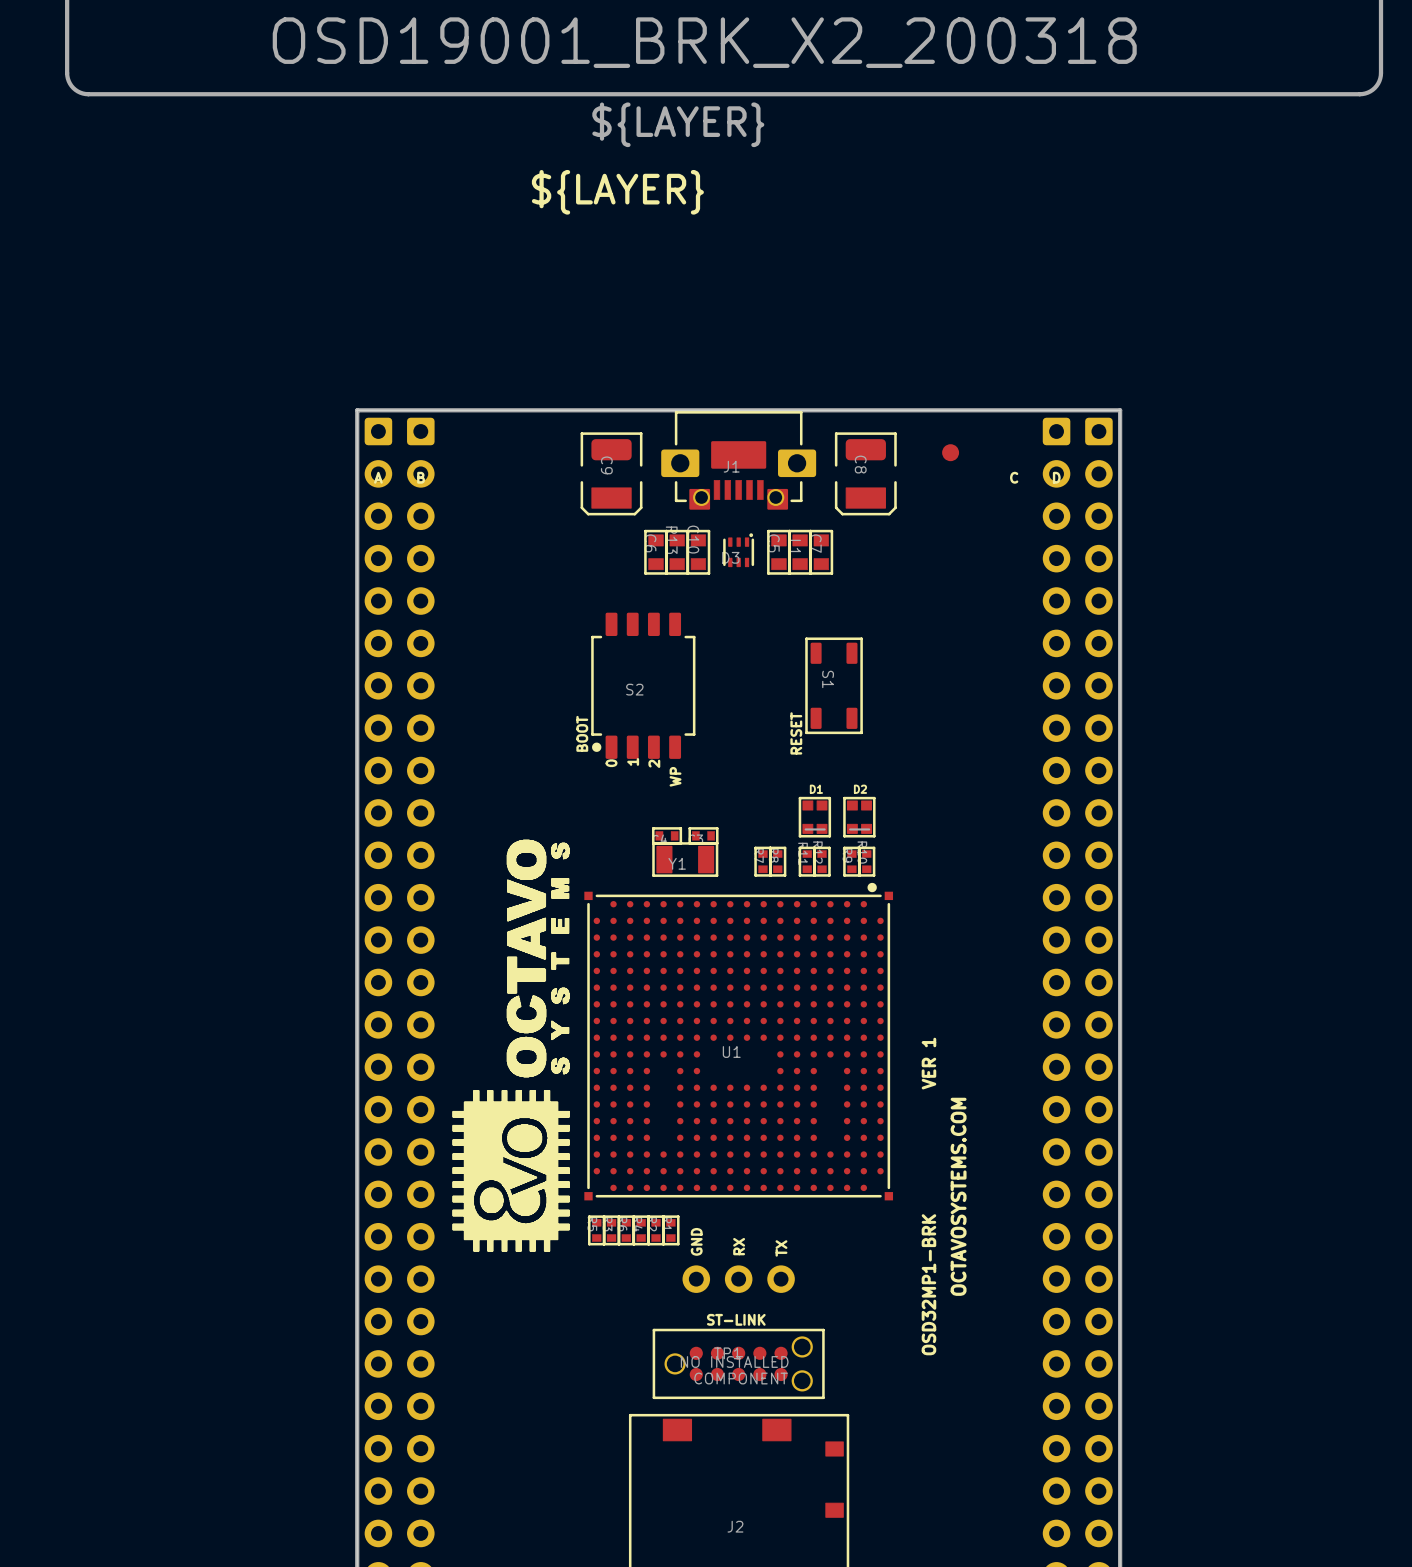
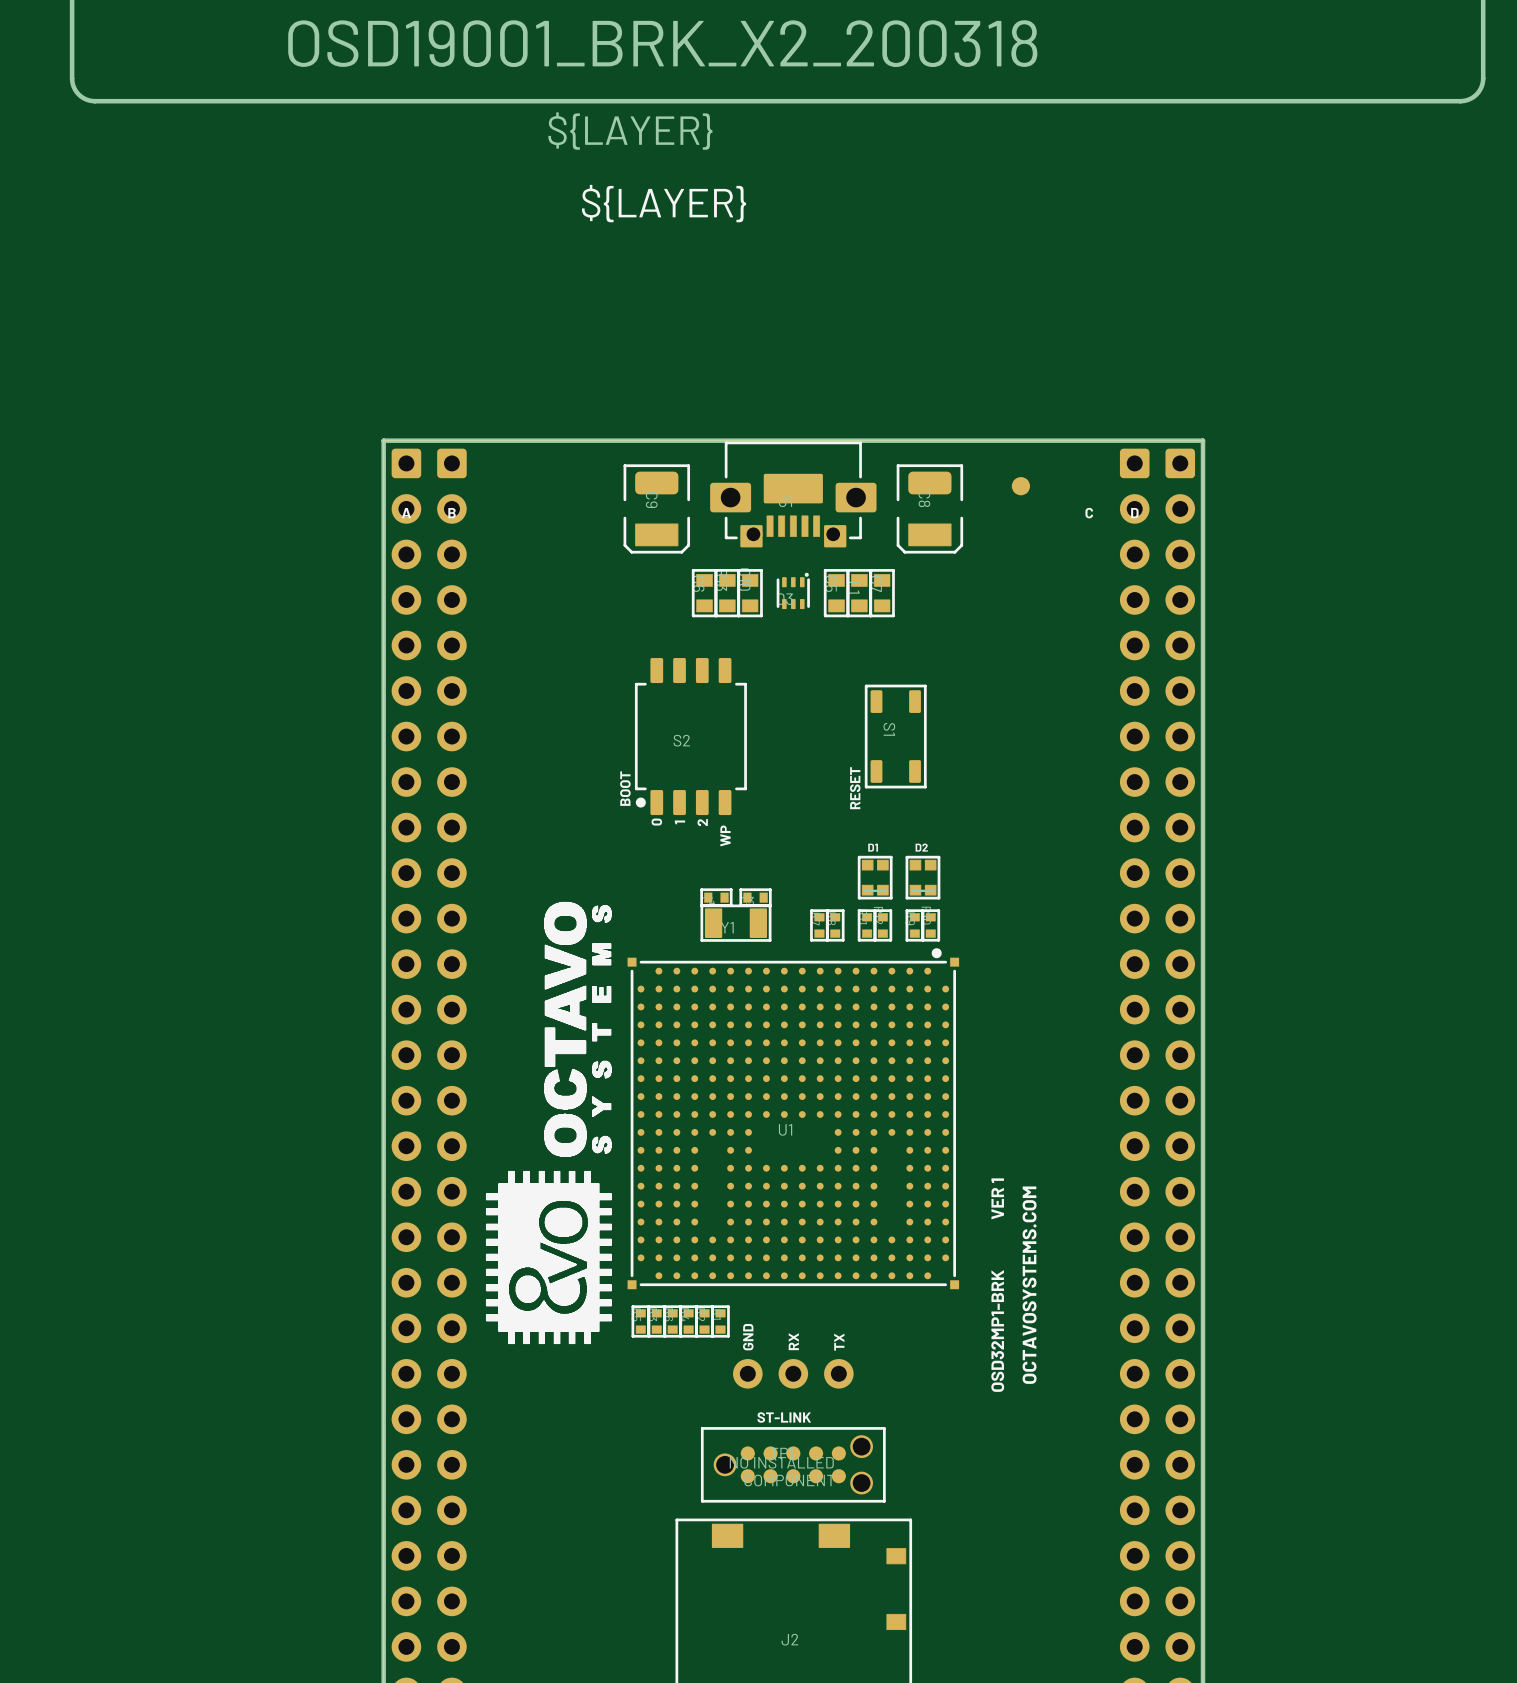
text position: ${LAYER} (678, 124) -> ${LAYER} (630, 131)

